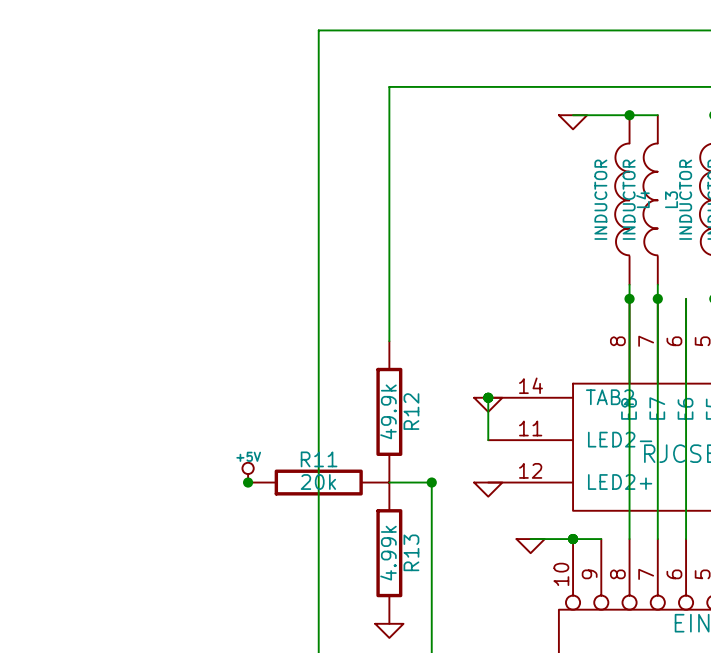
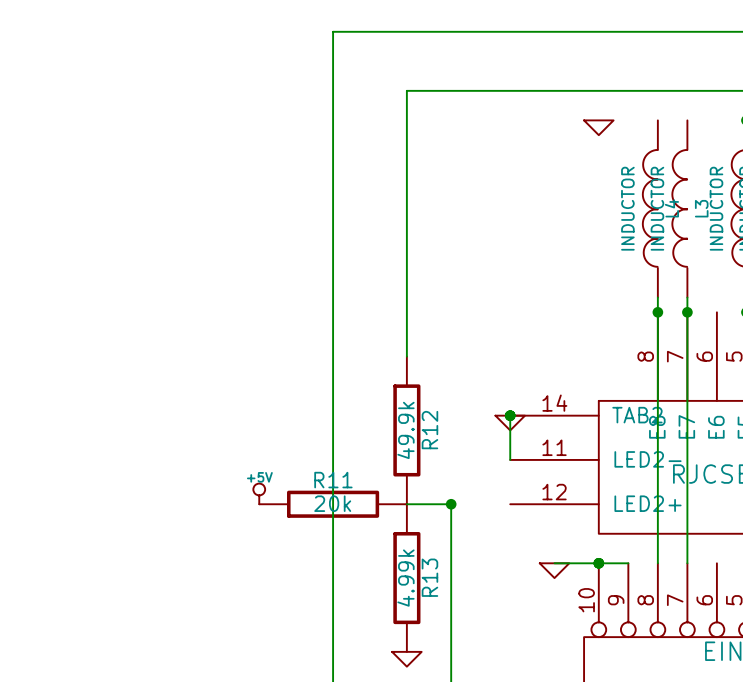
wire: (573, 115) (657, 115) -> none
junction: (629, 115) -> none
wire: (686, 298) (686, 539) -> none
junction: (248, 482) -> none
power symbol: (488, 489) -> none

